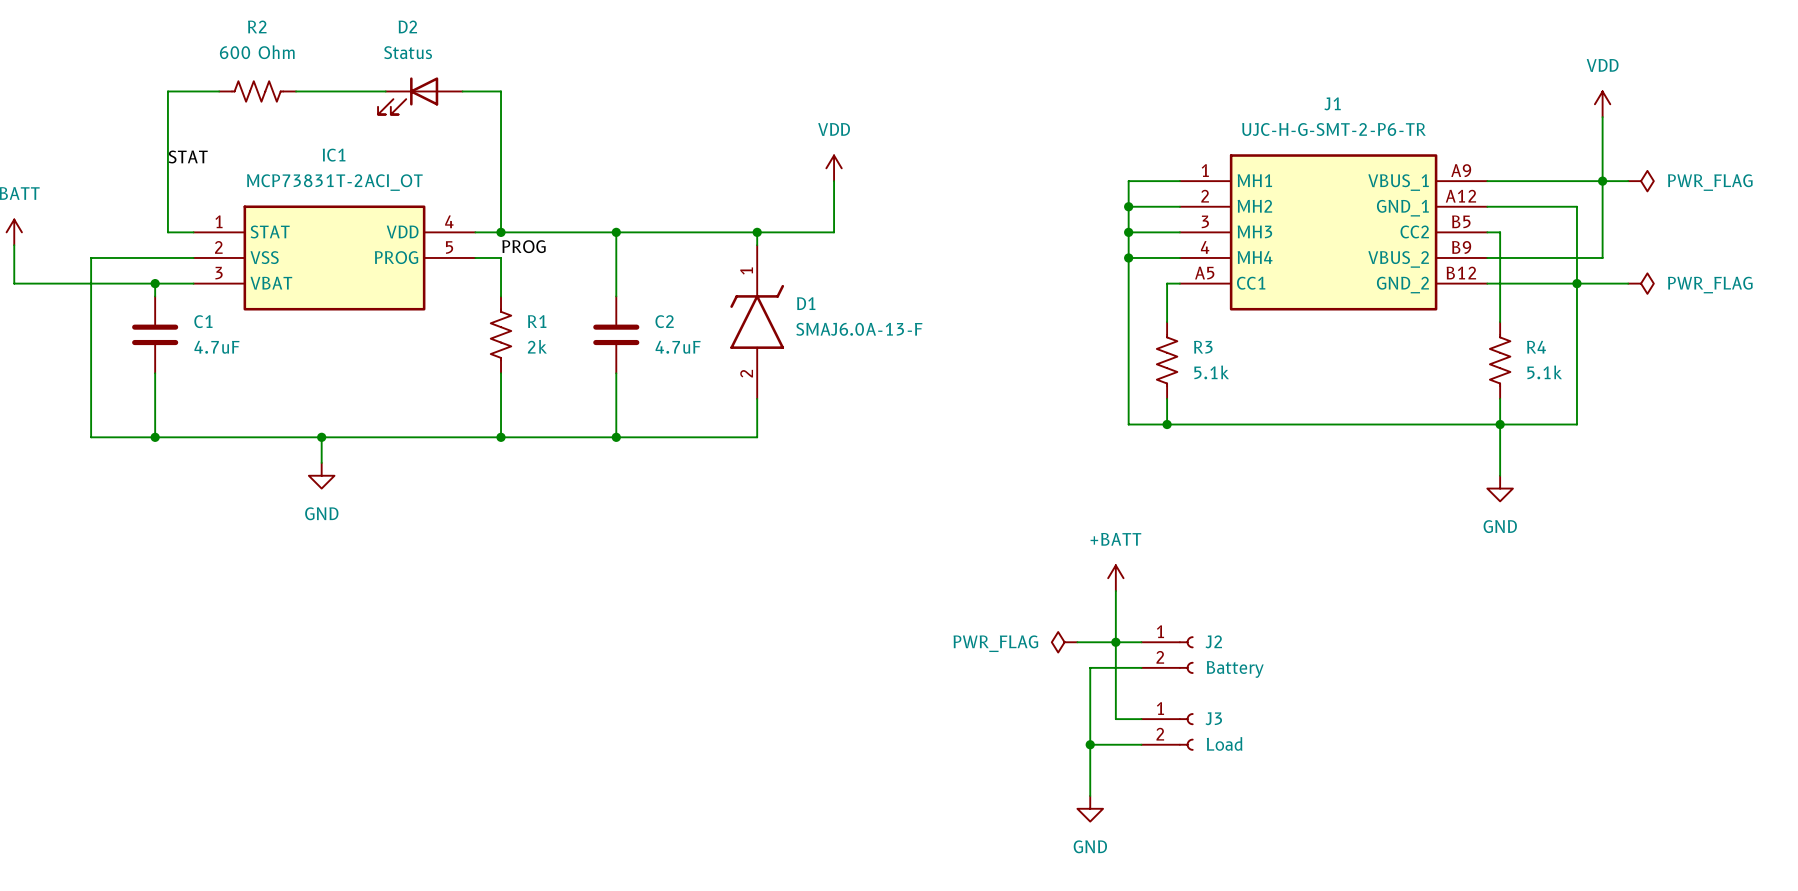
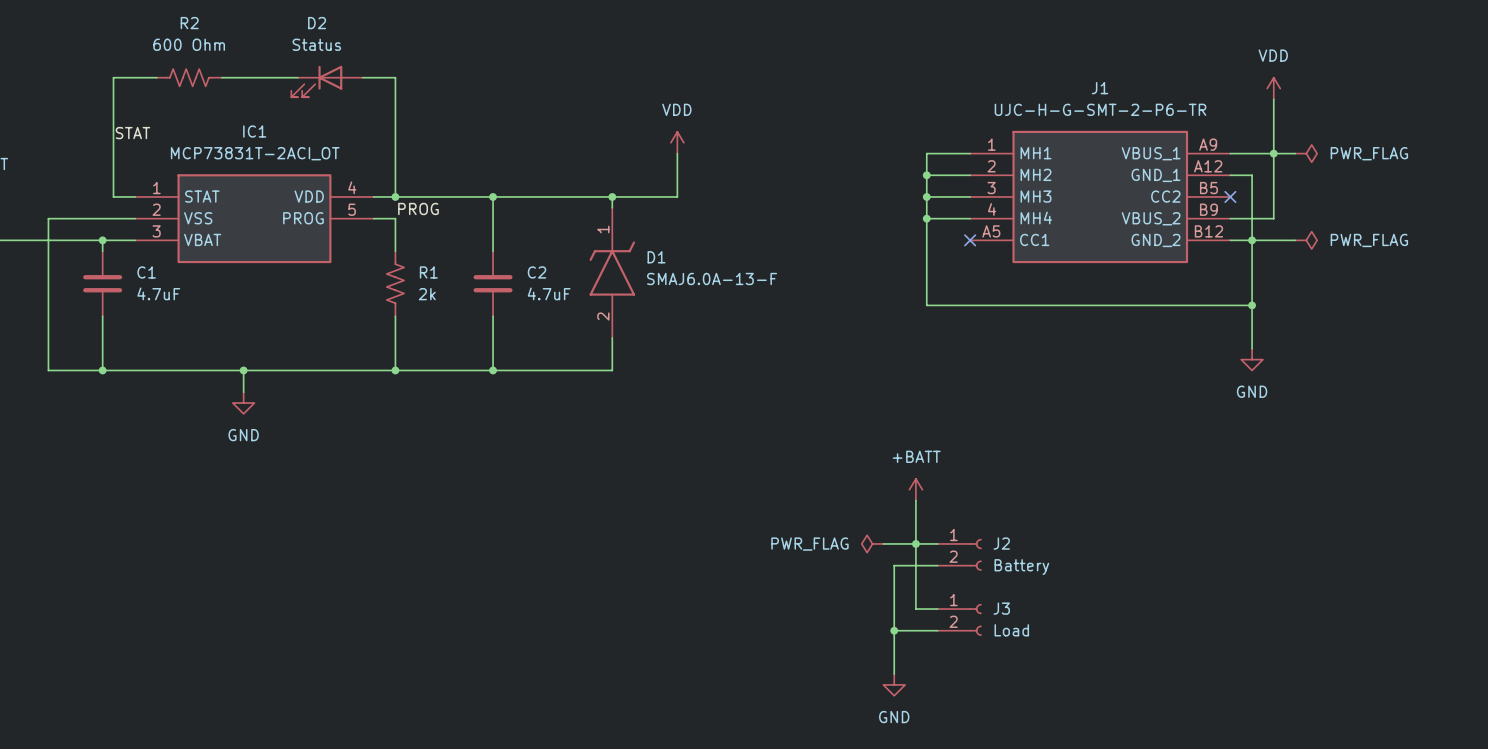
power symbol position: VDD (1602, 104) -> VDD (1273, 88)
wire: (1602, 117) (1602, 257) (1538, 257) -> (1273, 99) (1273, 218)
junction: none -> (1273, 153)
wire: (1564, 181) (1628, 181) -> none
power symbol: none -> PWR_FLAG (1306, 153)
junction: (1602, 181) -> none
power symbol: PWR_FLAG (1641, 181) -> none
wire: (1512, 206) (1576, 206) (1576, 424) (1128, 424) (1128, 360) -> (1252, 305) (926, 305)
wire: none -> (1252, 175) (1252, 348)
wire: (1487, 232) (1500, 232) (1500, 322) -> none
no-connect mark: none -> (1230, 196)
wire: (1179, 283) (1167, 283) (1167, 322) -> none
no-connect mark: none -> (970, 240)
junction: none -> (1252, 240)
wire: (1564, 283) (1628, 283) -> none
junction: (1576, 283) -> none
power symbol: none -> PWR_FLAG (1306, 240)
power symbol: PWR_FLAG (1641, 283) -> none
R3: 5.1k (1167, 360) -> none
R4: 5.1k (1500, 360) -> none
junction: none -> (1252, 305)
wire: (1167, 398) (1167, 424) -> none
wire: (1500, 398) (1500, 475) -> none
junction: (1167, 424) -> none
junction: (1500, 424) -> none
power symbol position: GND (1500, 488) -> GND (1252, 359)

